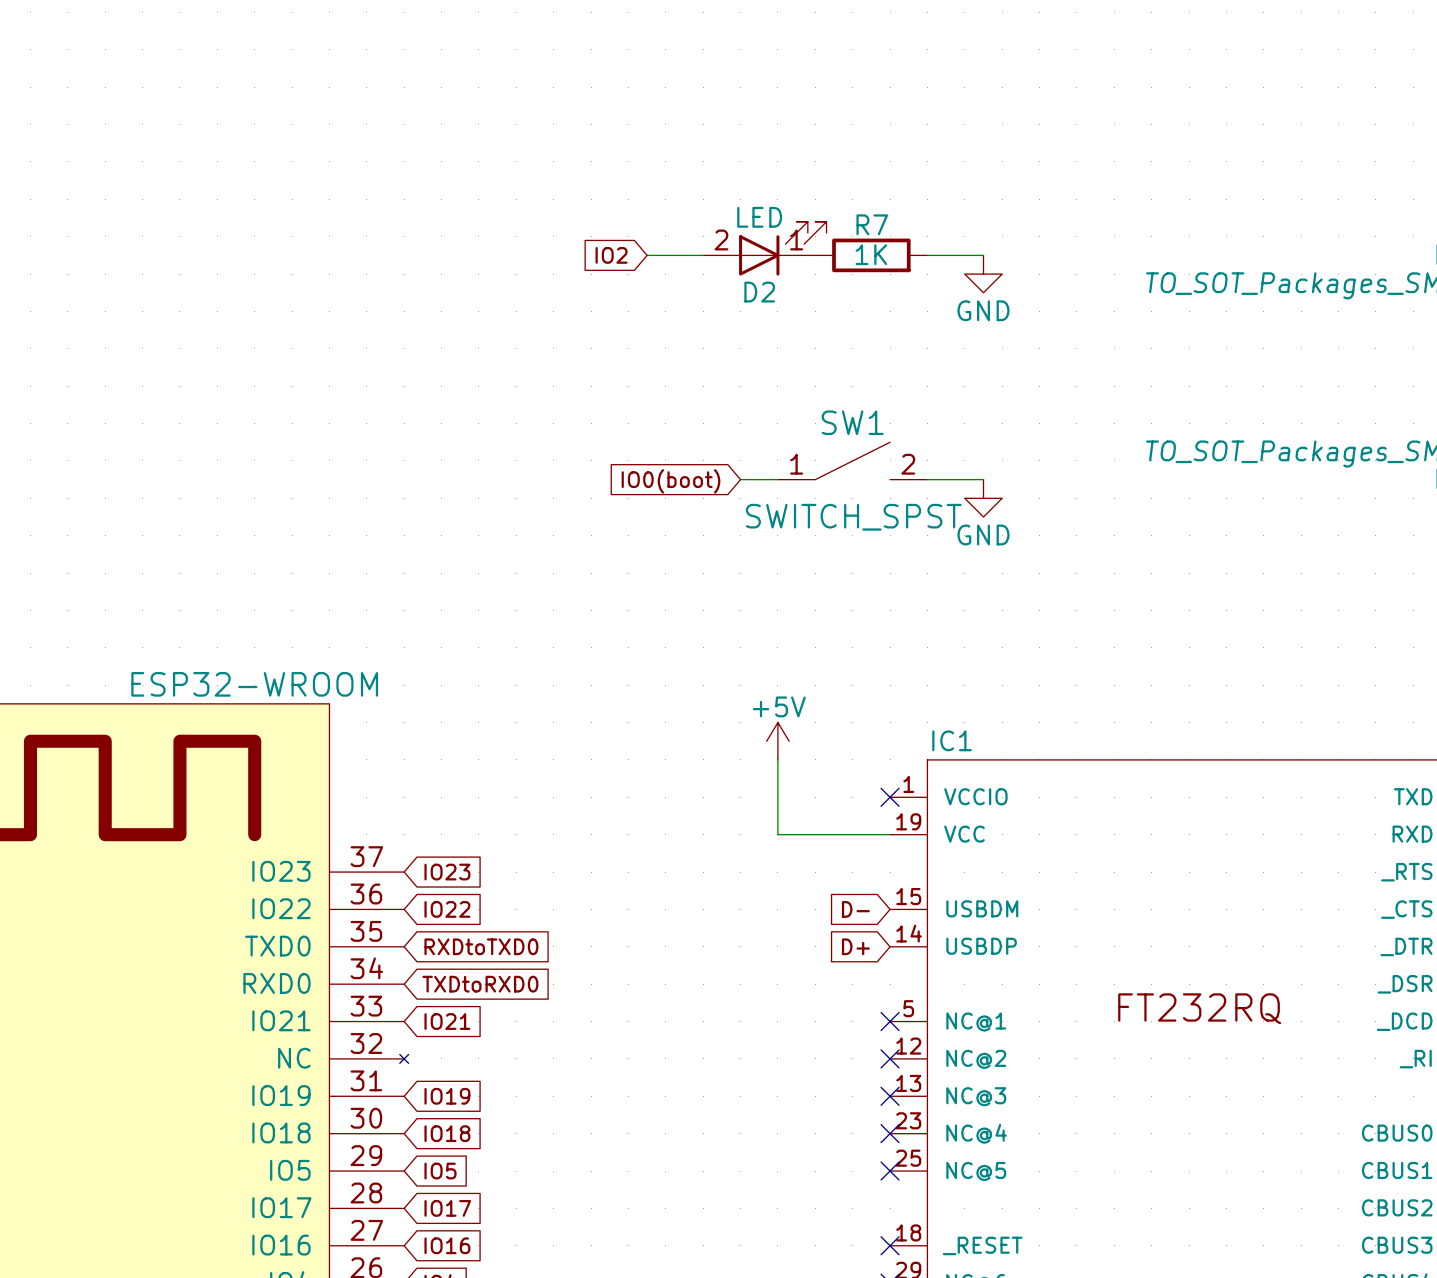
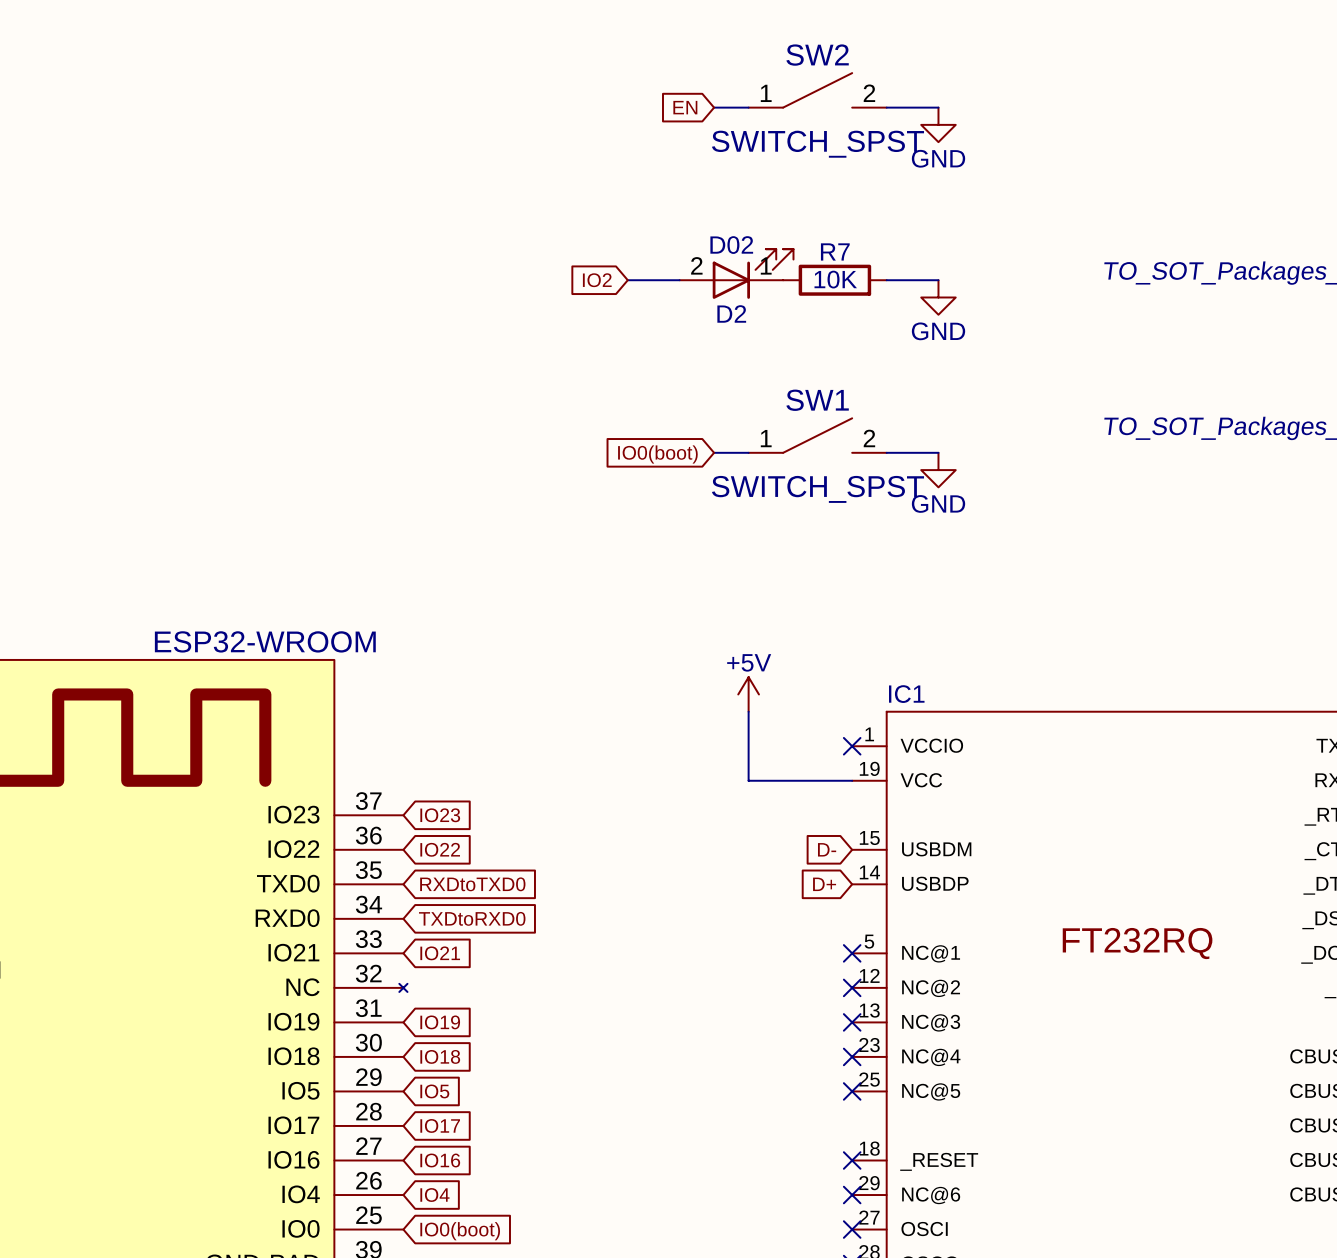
SW2: none -> SWITCH_SPST (817, 90)
global label: none -> EN (685, 107)
wire: none -> (714, 107) (748, 107)
wire: none -> (886, 107) (938, 107)
power symbol: none -> GND (938, 124)
D2 value: LED (759, 217) -> D02 (731, 245)
D2 position: (764, 248) -> (736, 274)
R7 value: 1K (871, 254) -> 10K (835, 279)
global label position: IO2 (611, 255) -> IO2 (597, 280)
wire: (647, 255) (703, 255) -> (627, 280) (679, 280)
R7 position: (871, 255) -> (834, 280)
wire: (927, 255) (983, 255) -> (886, 280) (938, 280)
power symbol position: GND (983, 274) -> GND (938, 297)

